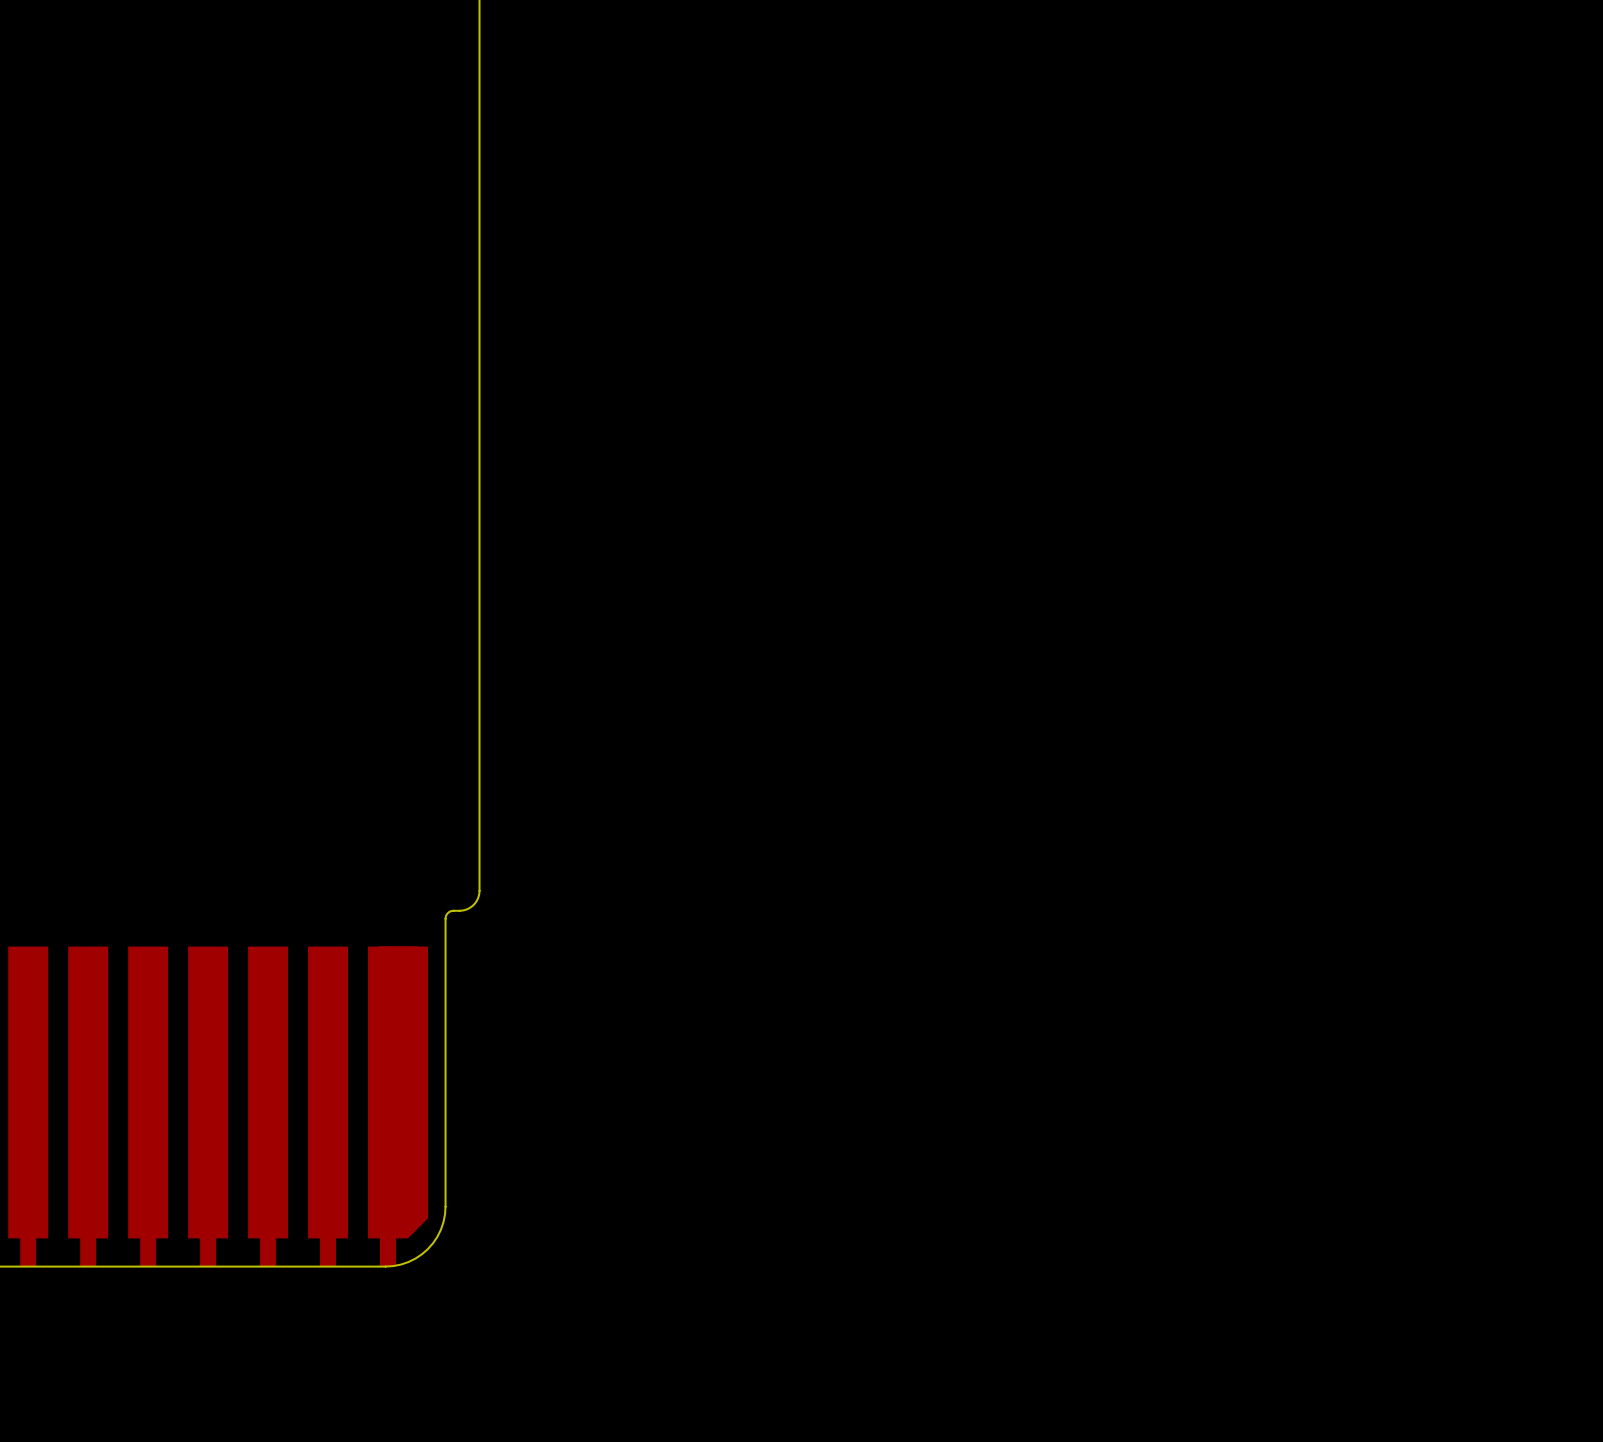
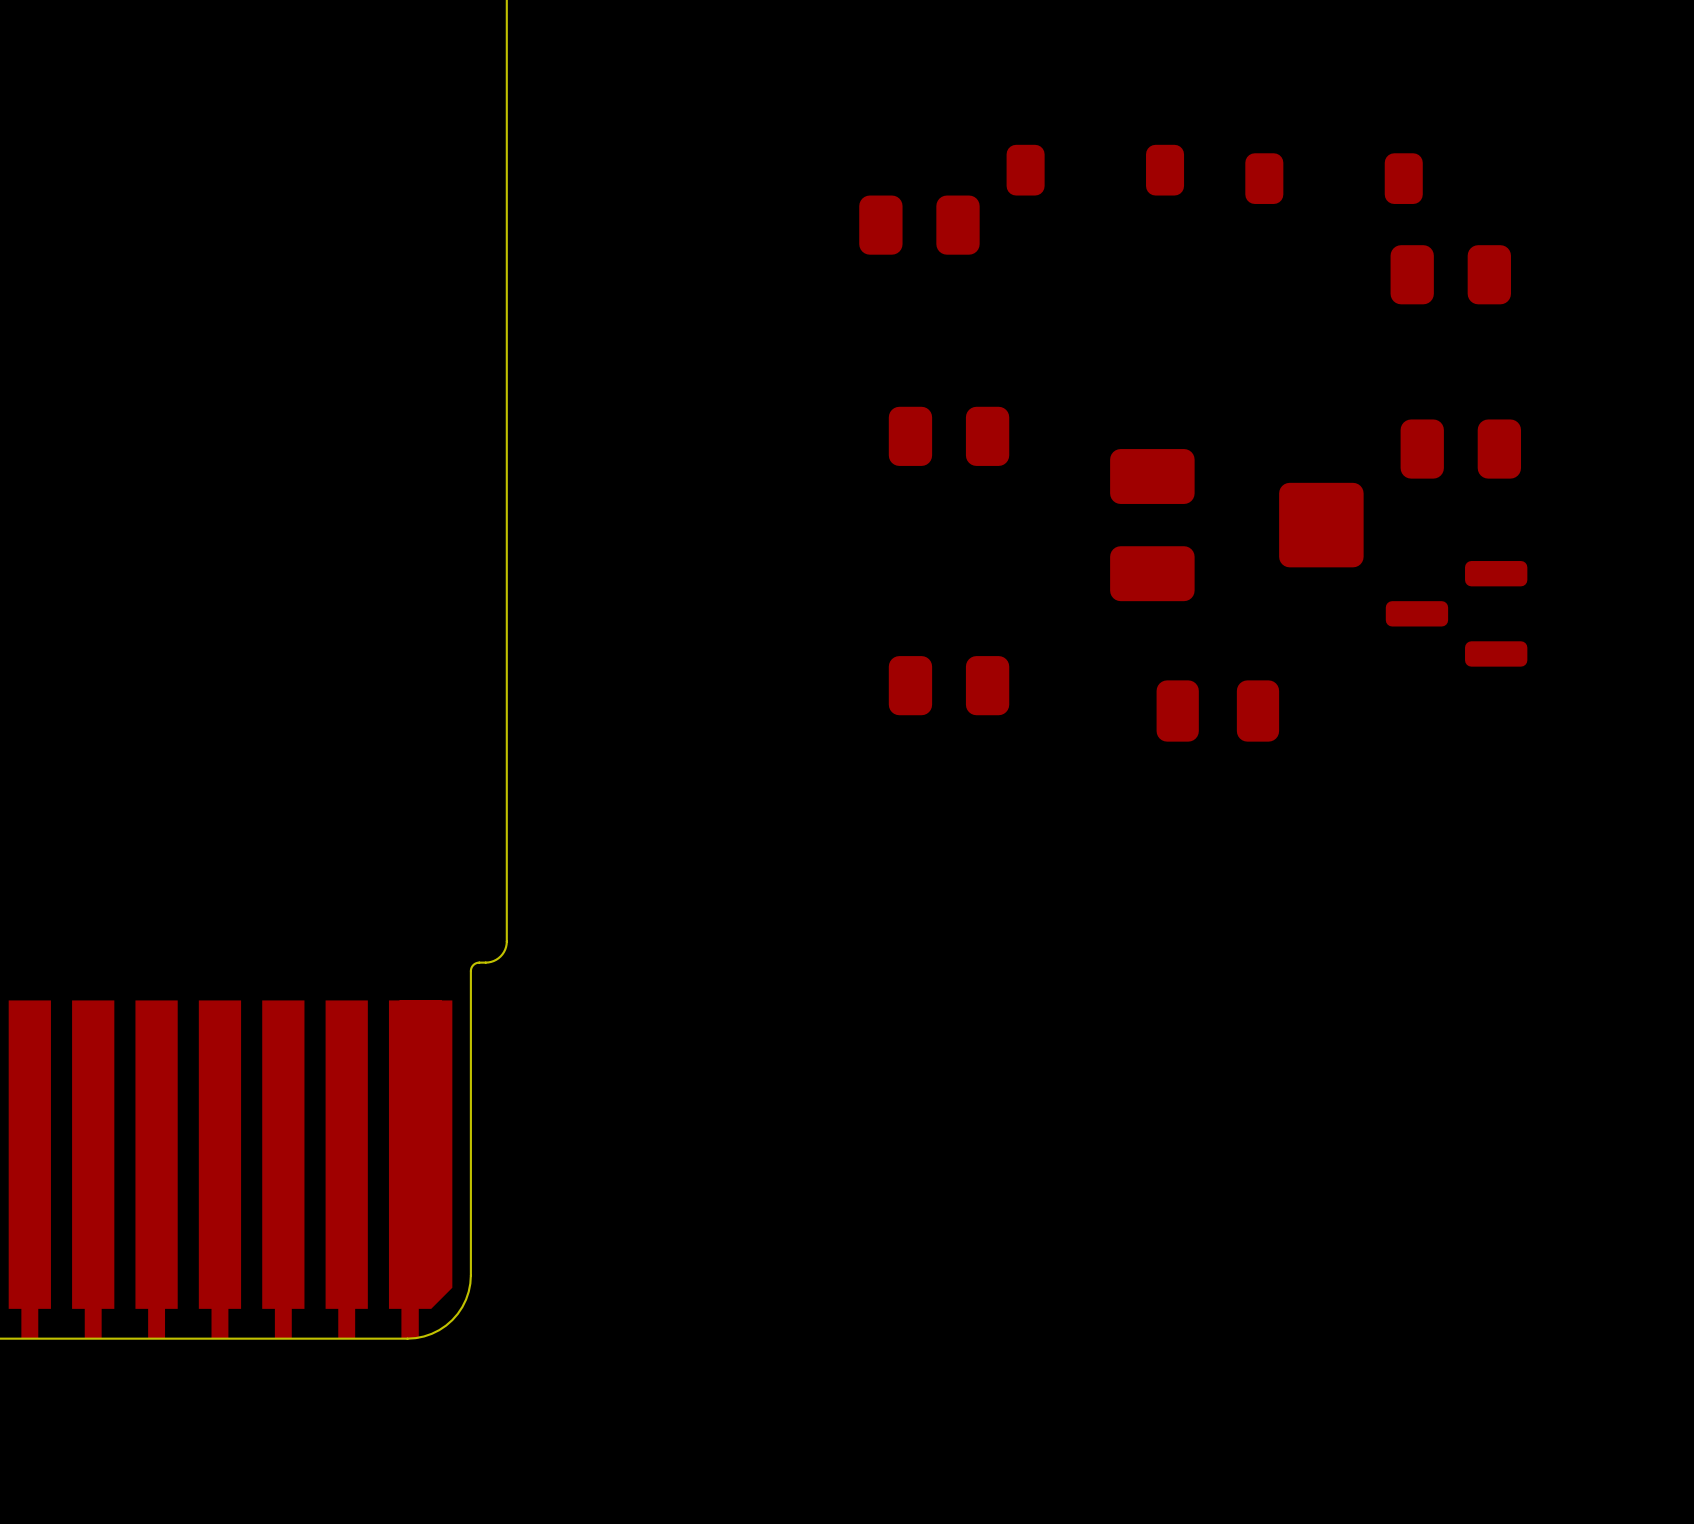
part: none -> (1095, 170)
part: none -> (1334, 178)
part: none -> (919, 225)
part: none -> (1450, 274)
part: none -> (949, 436)
part: none -> (1460, 449)
part: none -> (1236, 525)
part: none -> (1456, 613)
part: none -> (949, 685)
part: none -> (1217, 711)

